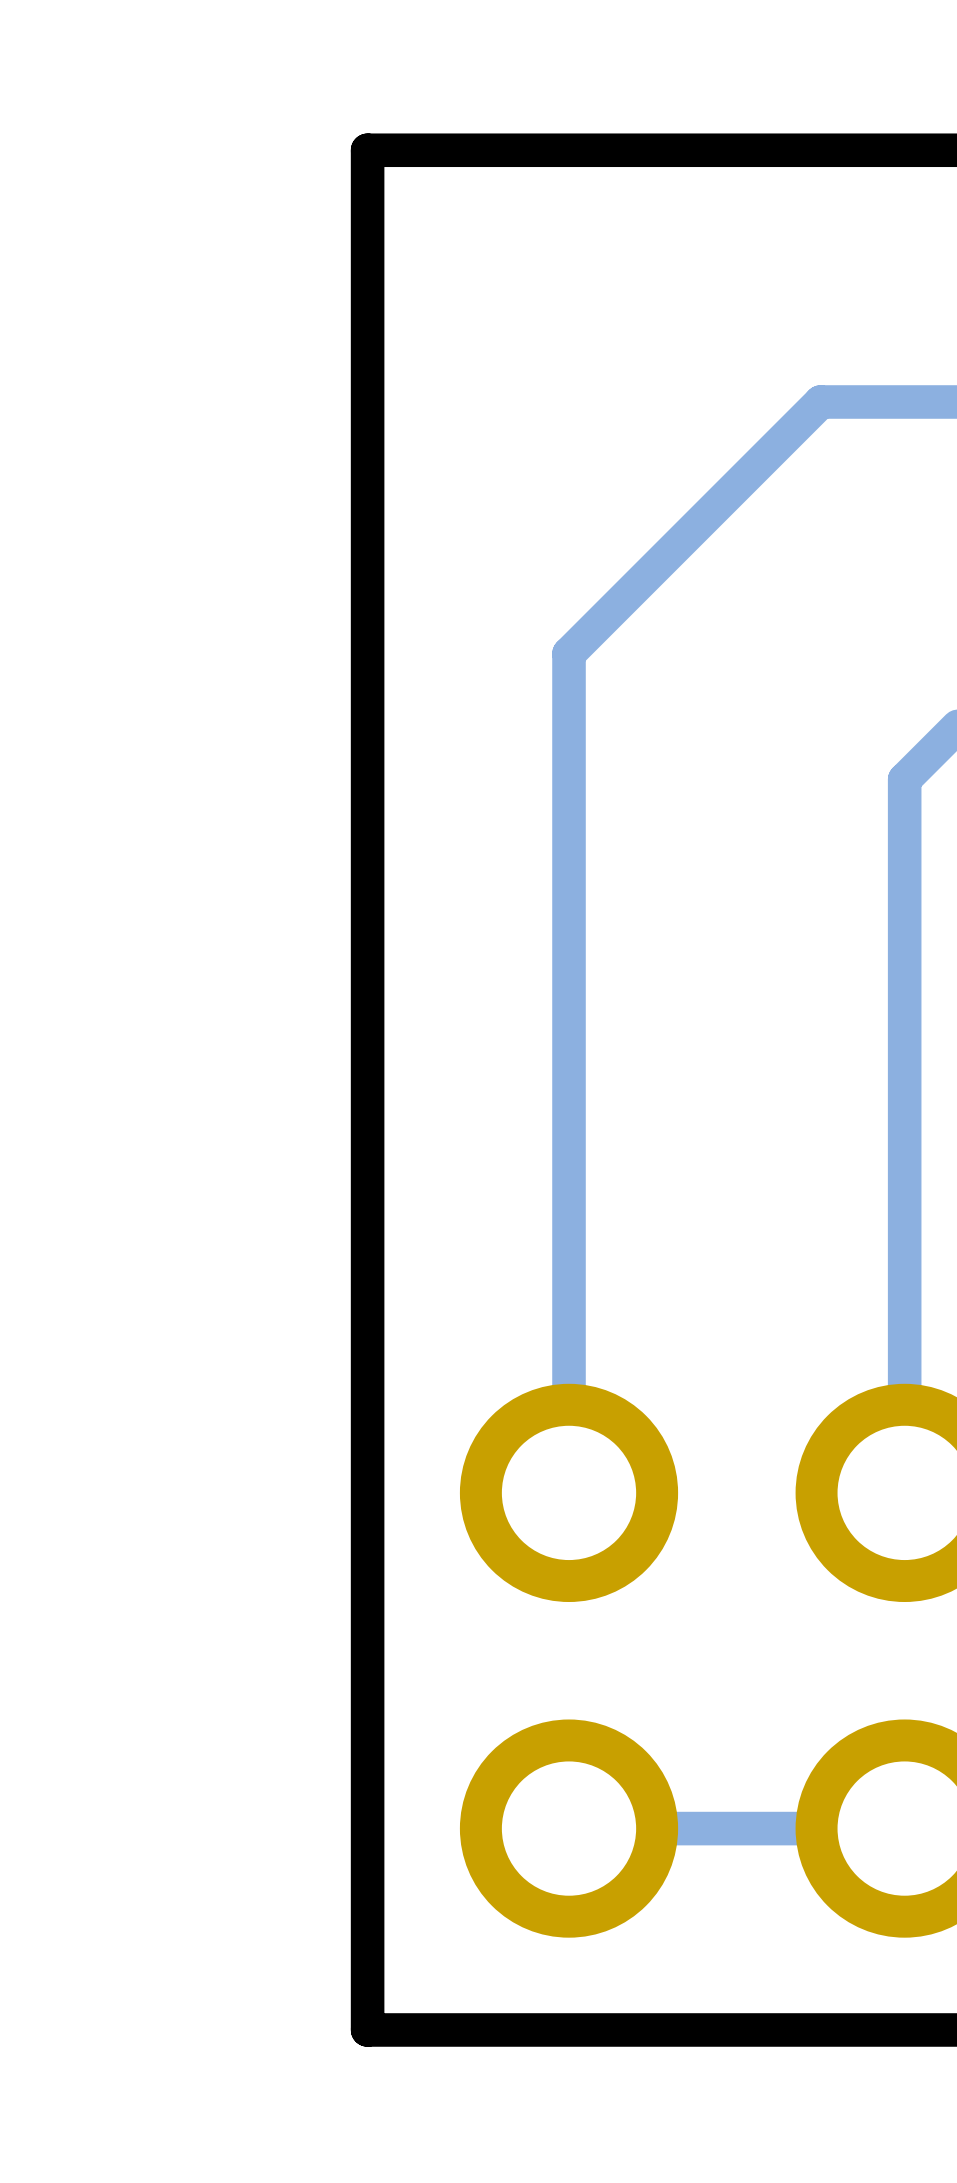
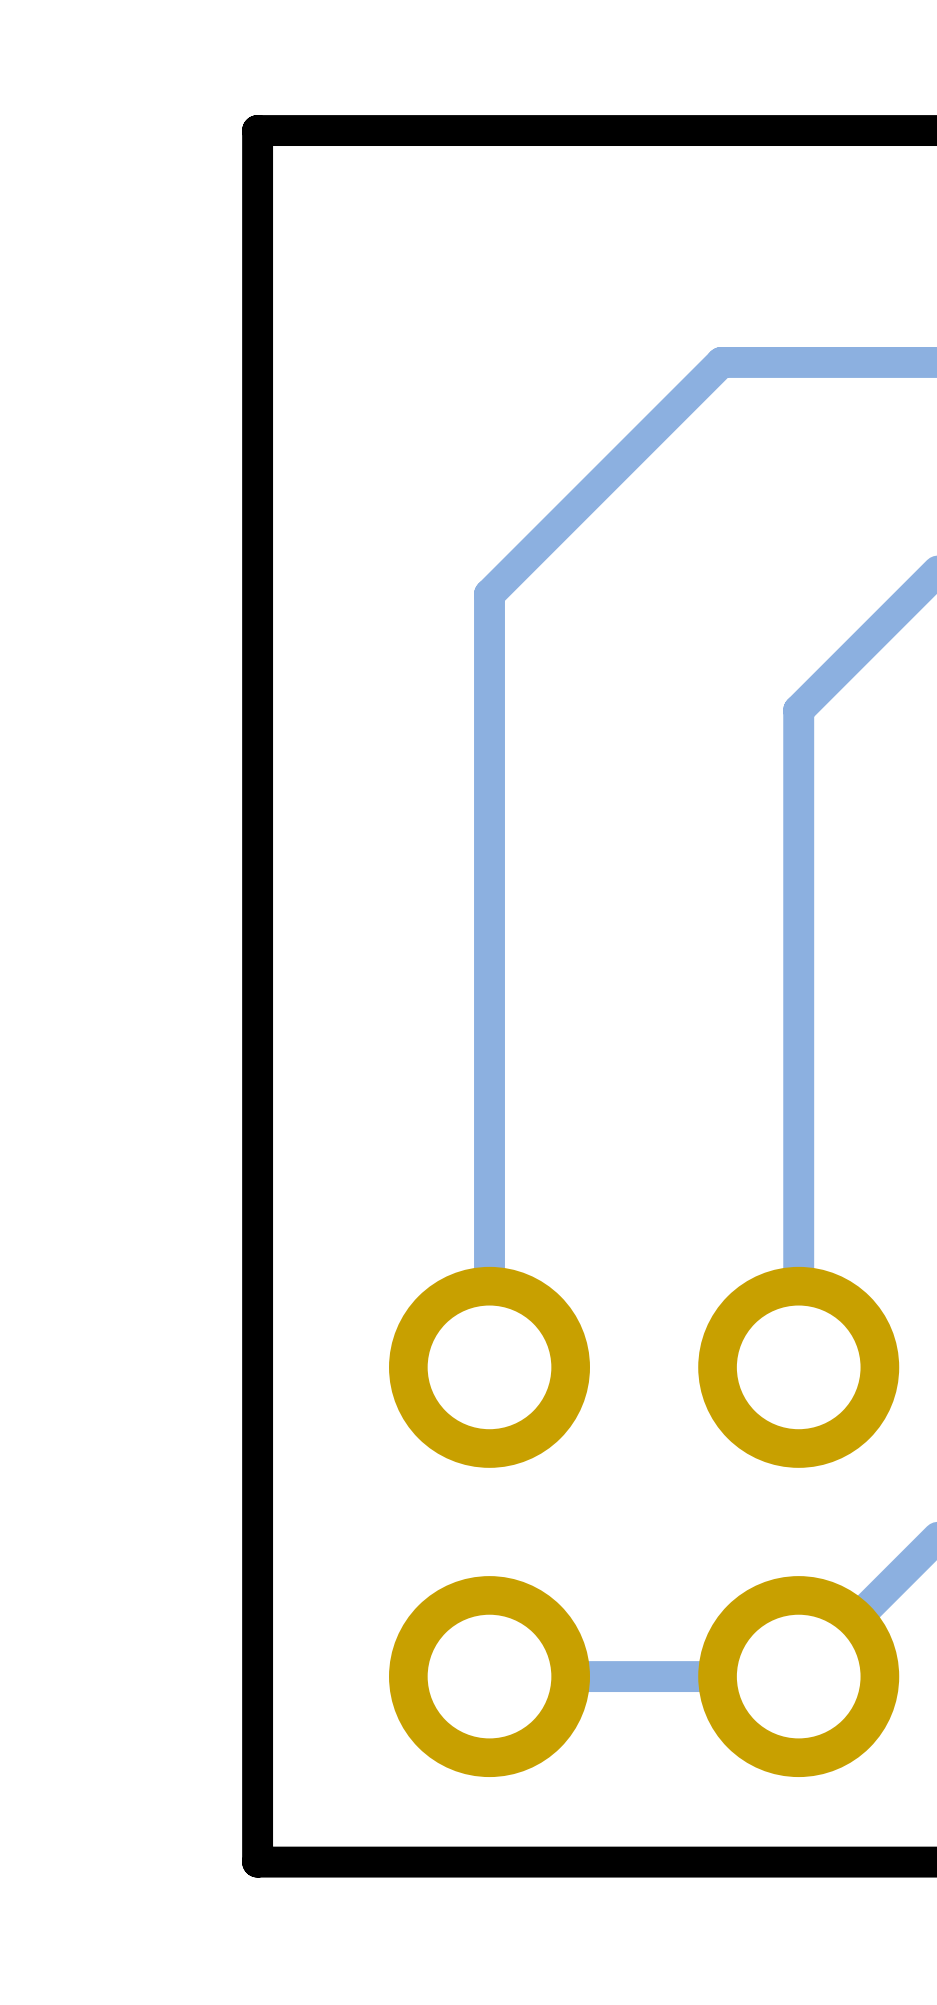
board edge: (367, 150) (367, 2029) -> (303, 130) (257, 130) (257, 1862) (303, 1862)

